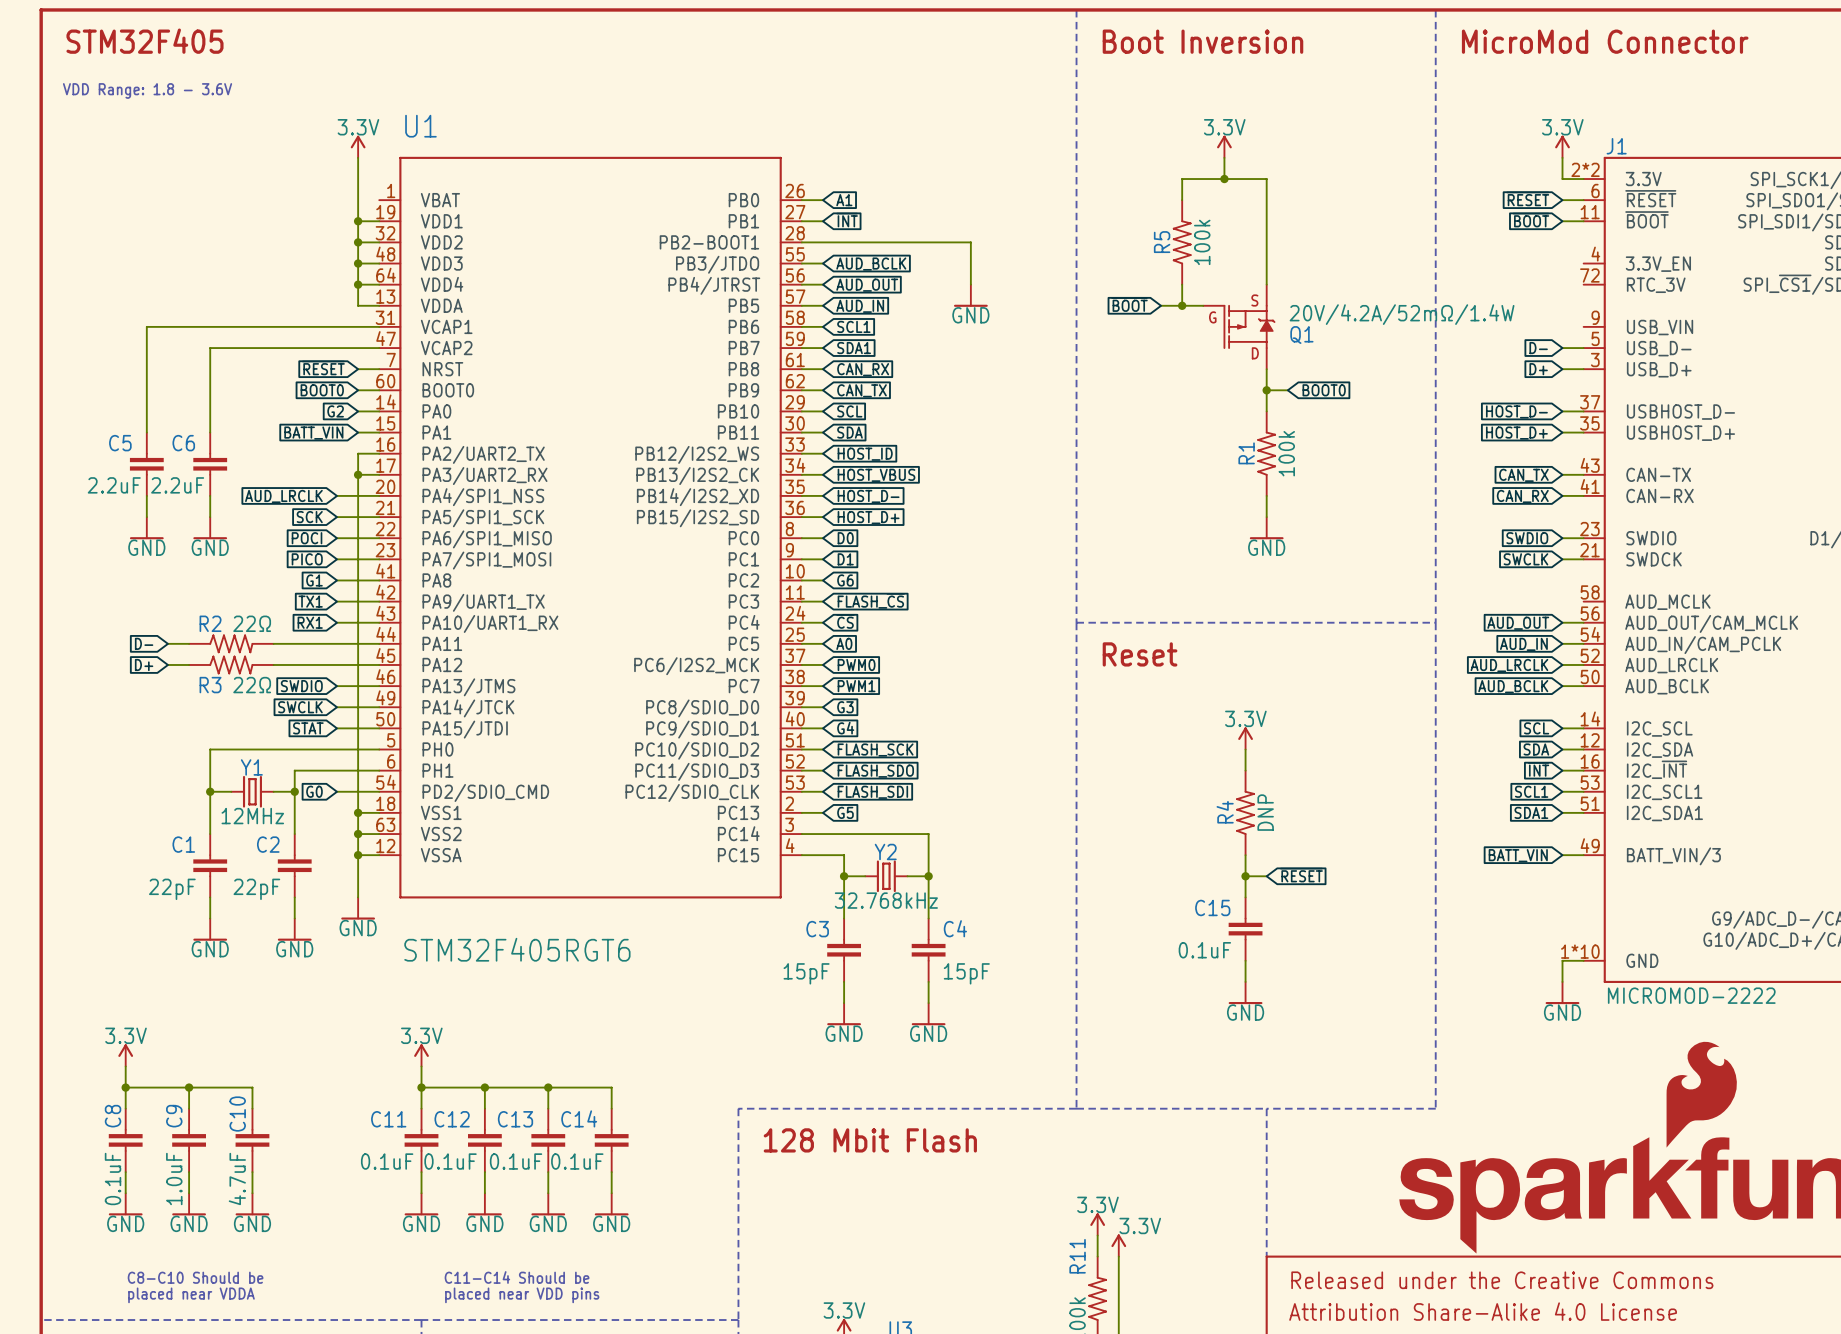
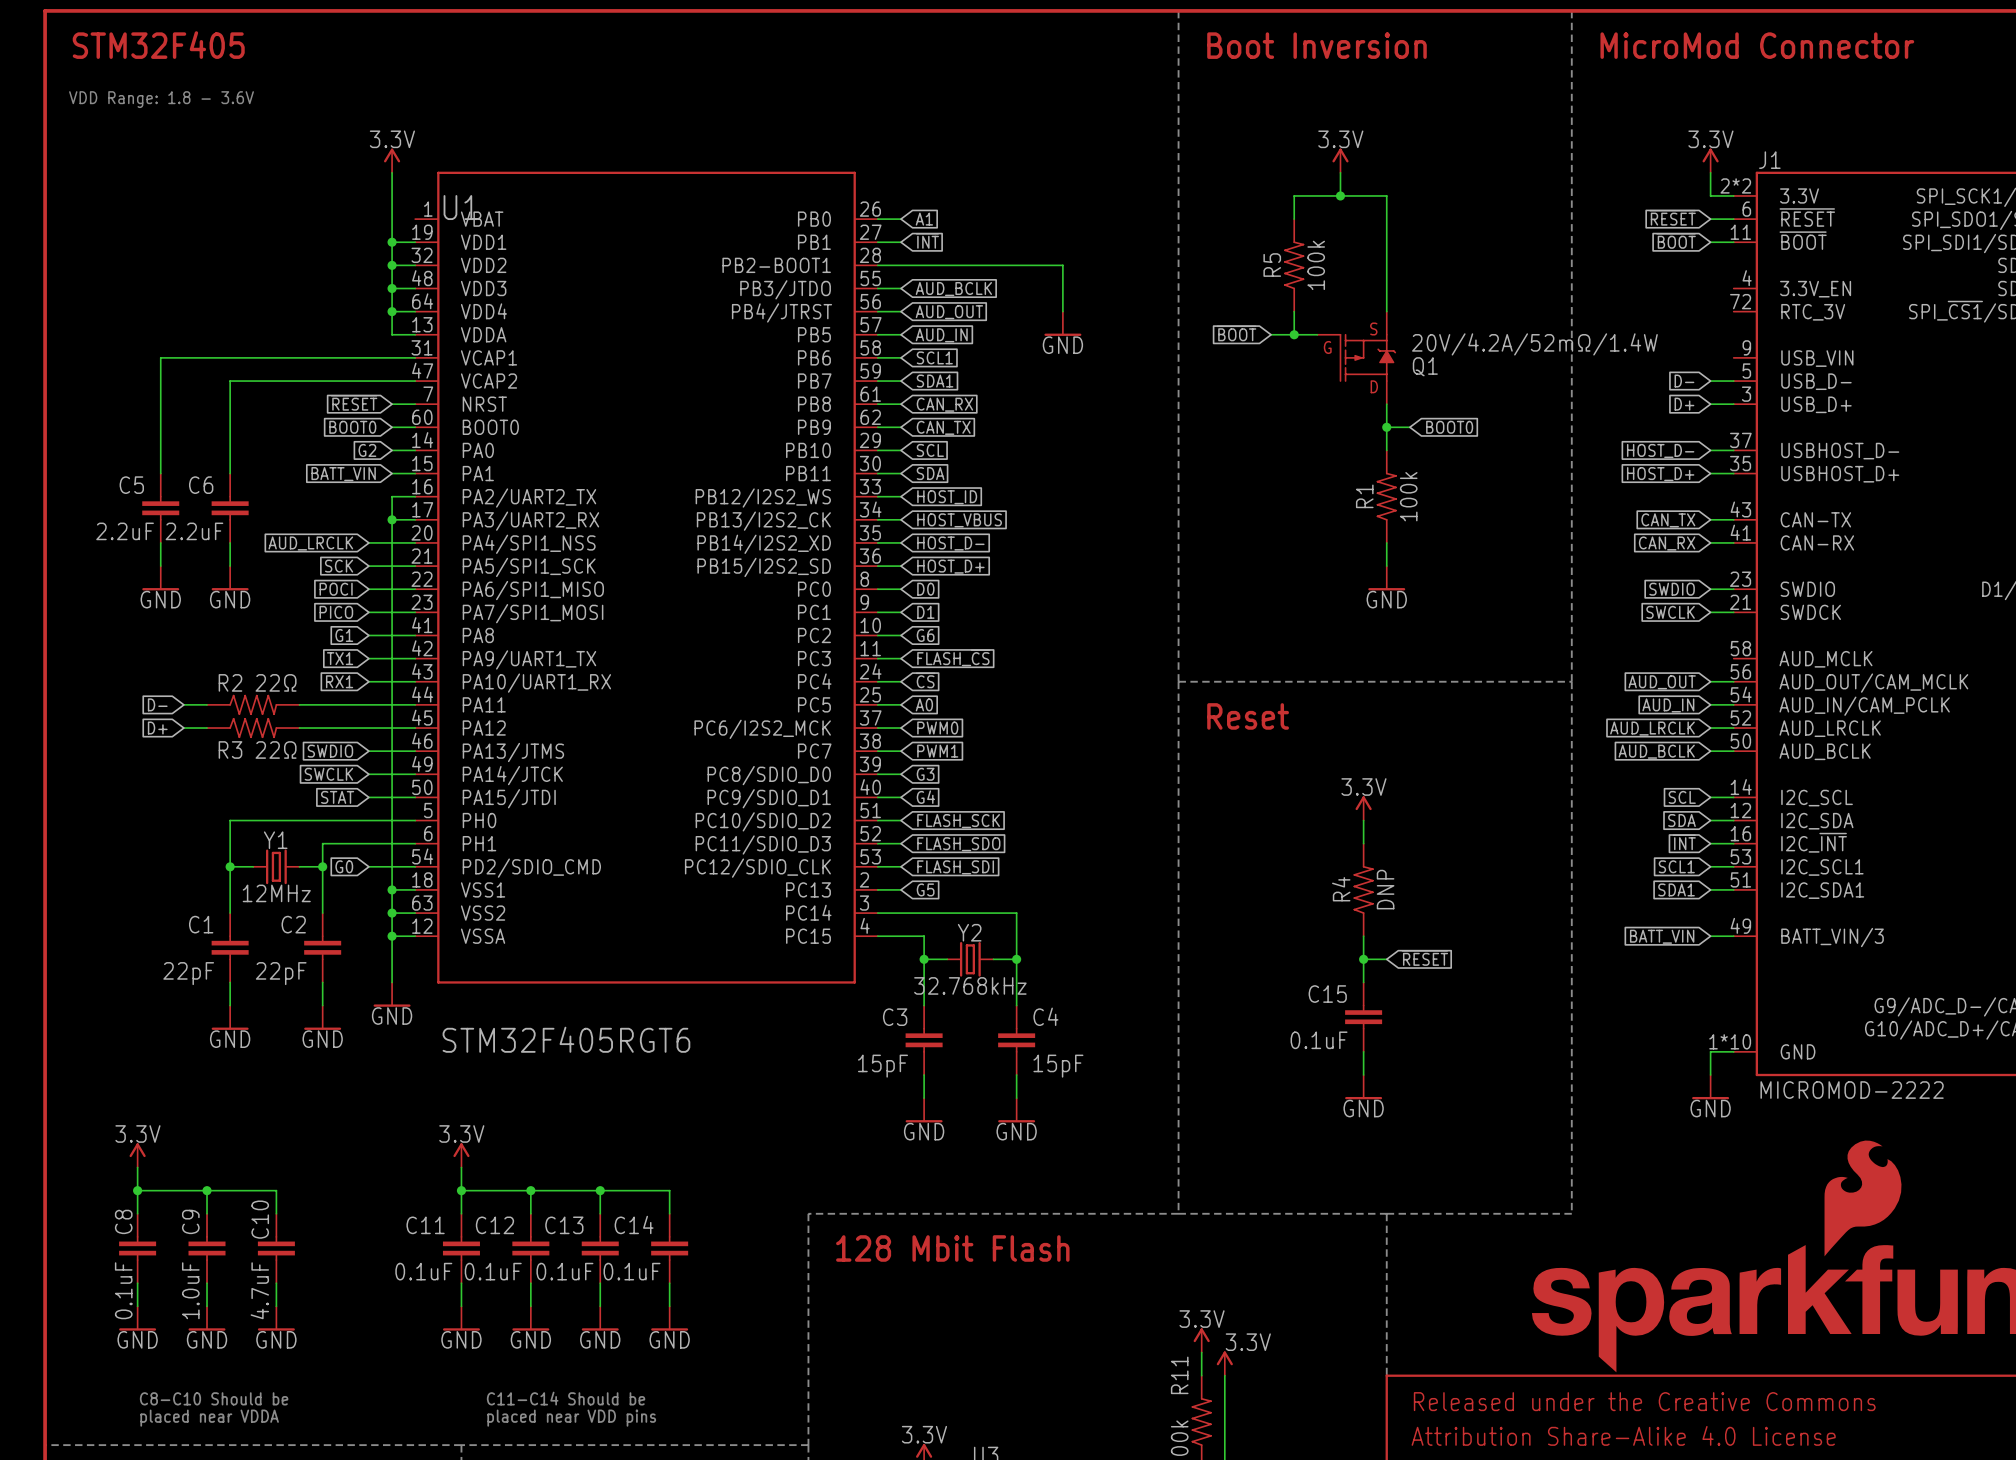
U1 name position: U1 (420, 126) -> U1 (460, 207)

